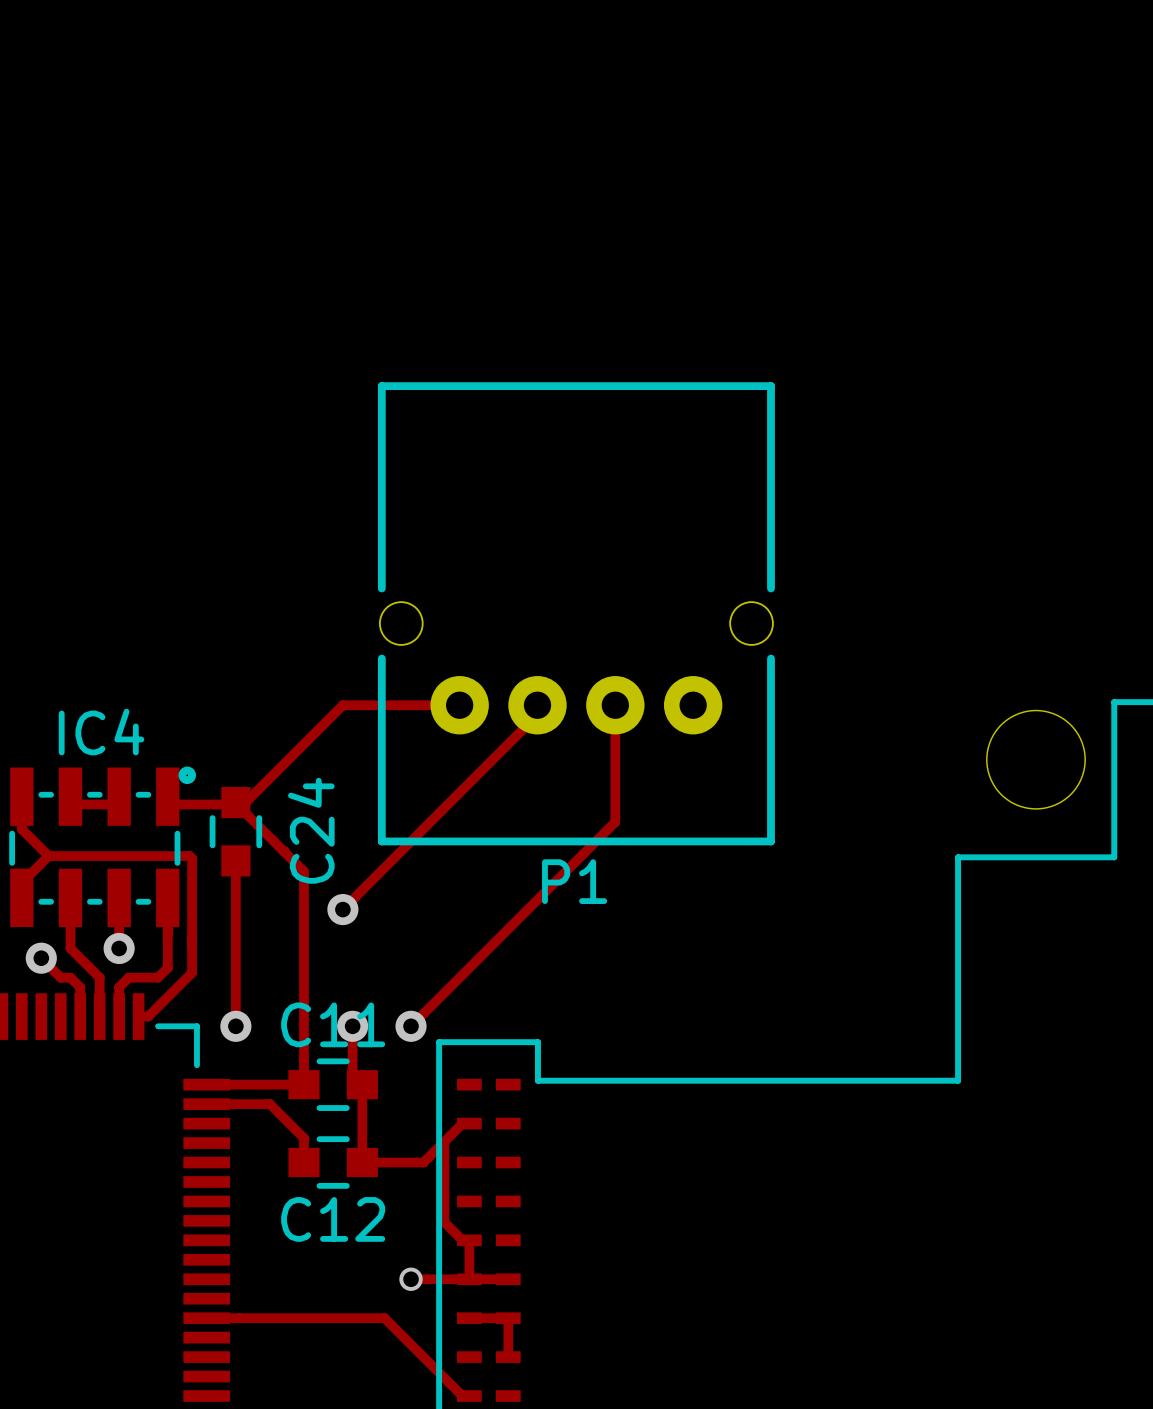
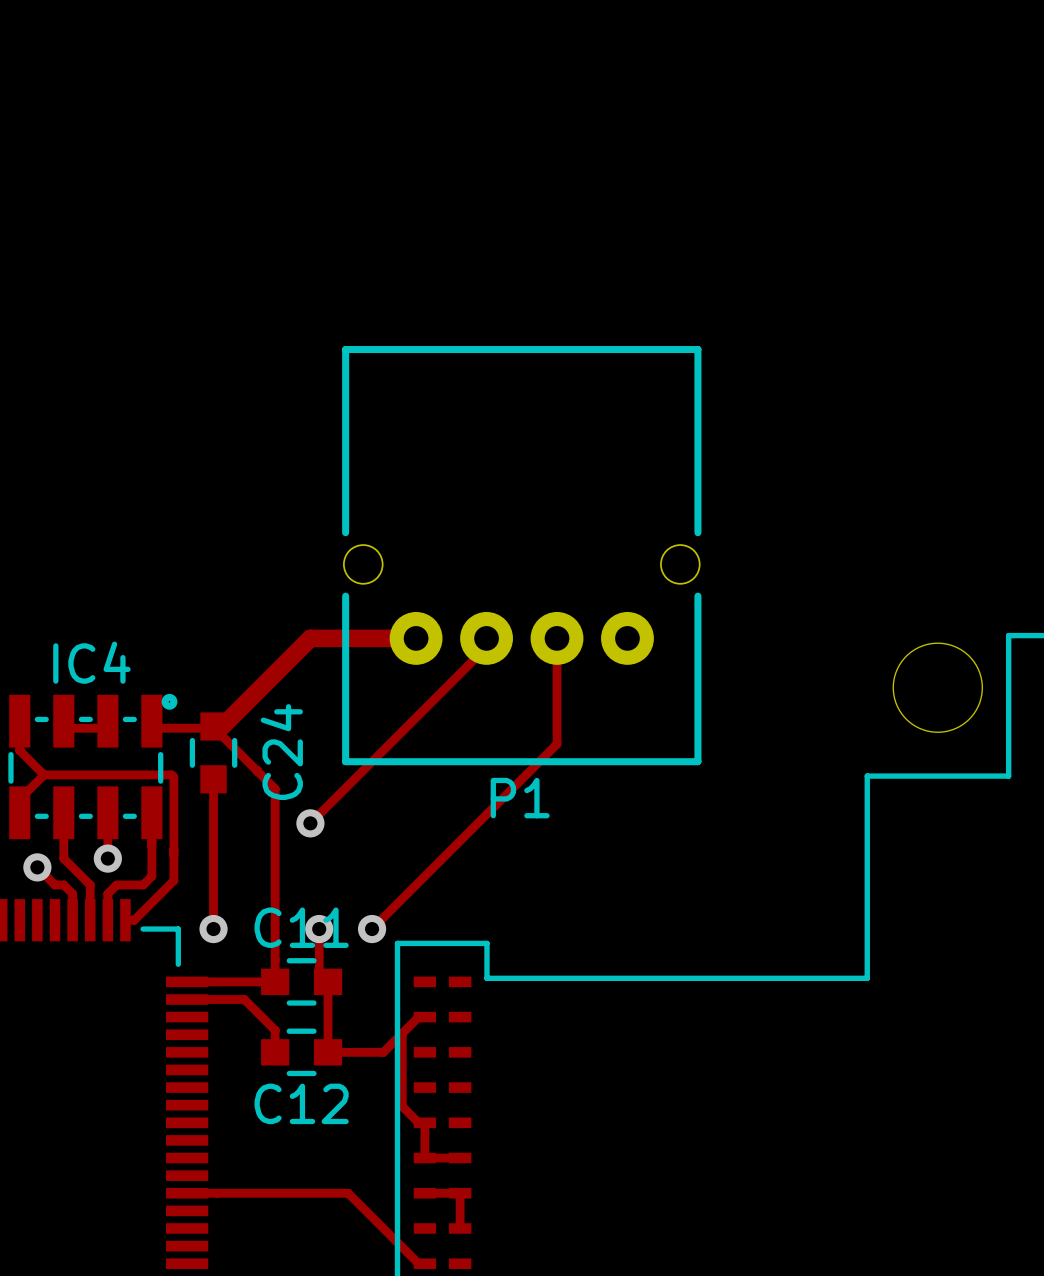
track width: thin (459, 705) (342, 705) (245, 802) -> thick (416, 638) (310, 638) (222, 726)
track: (411, 1279) (469, 1279) -> none
via: (411, 1279) -> none

